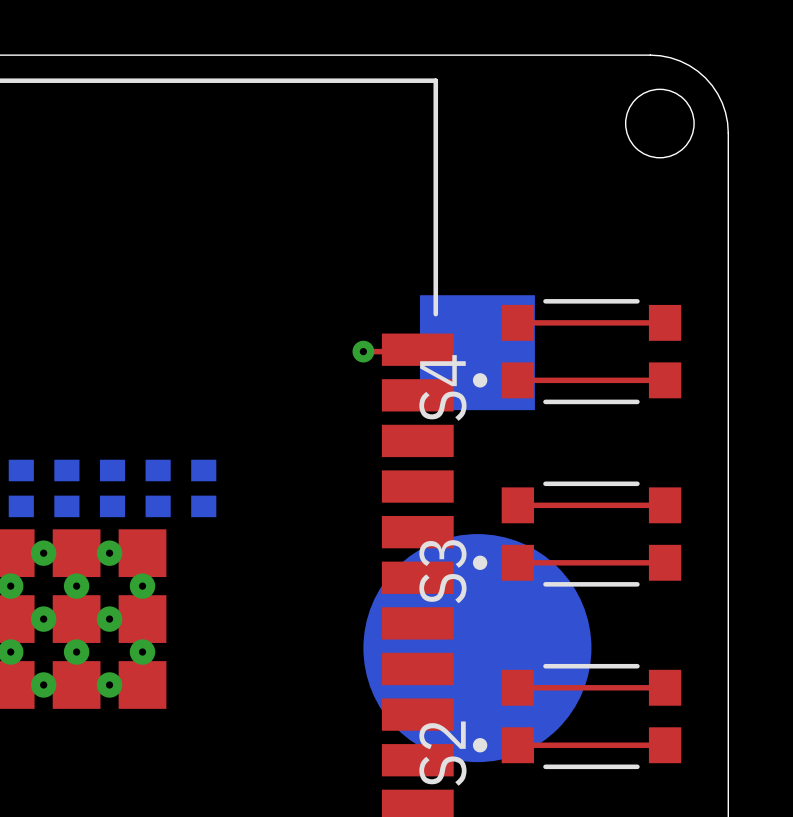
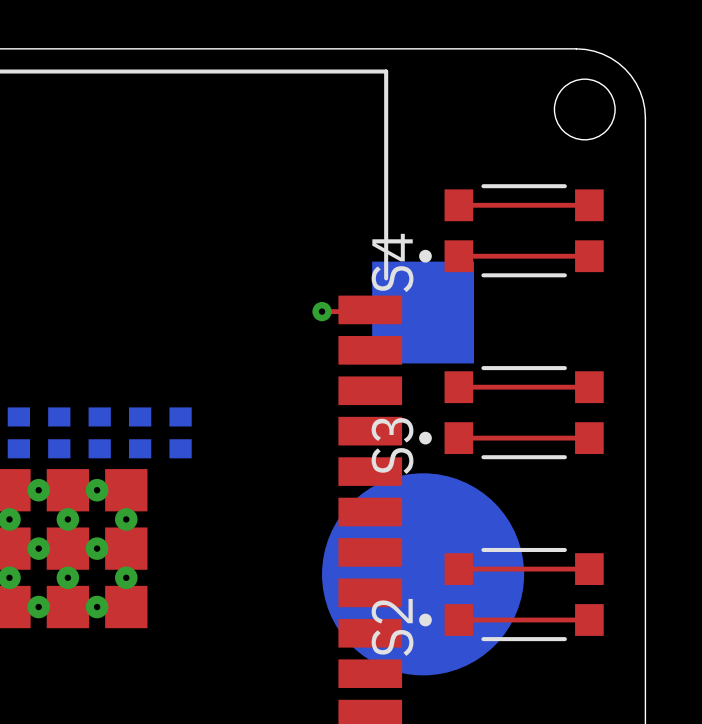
top track: (517, 322) (676, 322) -> (458, 205) (599, 205)
S4 position: (577, 351) -> (511, 230)
top track: (517, 380) (665, 380) -> (458, 256) (589, 256)
top track: (517, 505) (676, 505) -> (458, 387) (599, 387)
S3 position: (577, 534) -> (511, 412)
top track: (517, 562) (665, 562) -> (458, 438) (589, 438)
top track: (517, 687) (676, 687) -> (458, 569) (599, 569)
S2 position: (577, 716) -> (511, 594)
top track: (517, 745) (665, 745) -> (458, 620) (589, 620)

